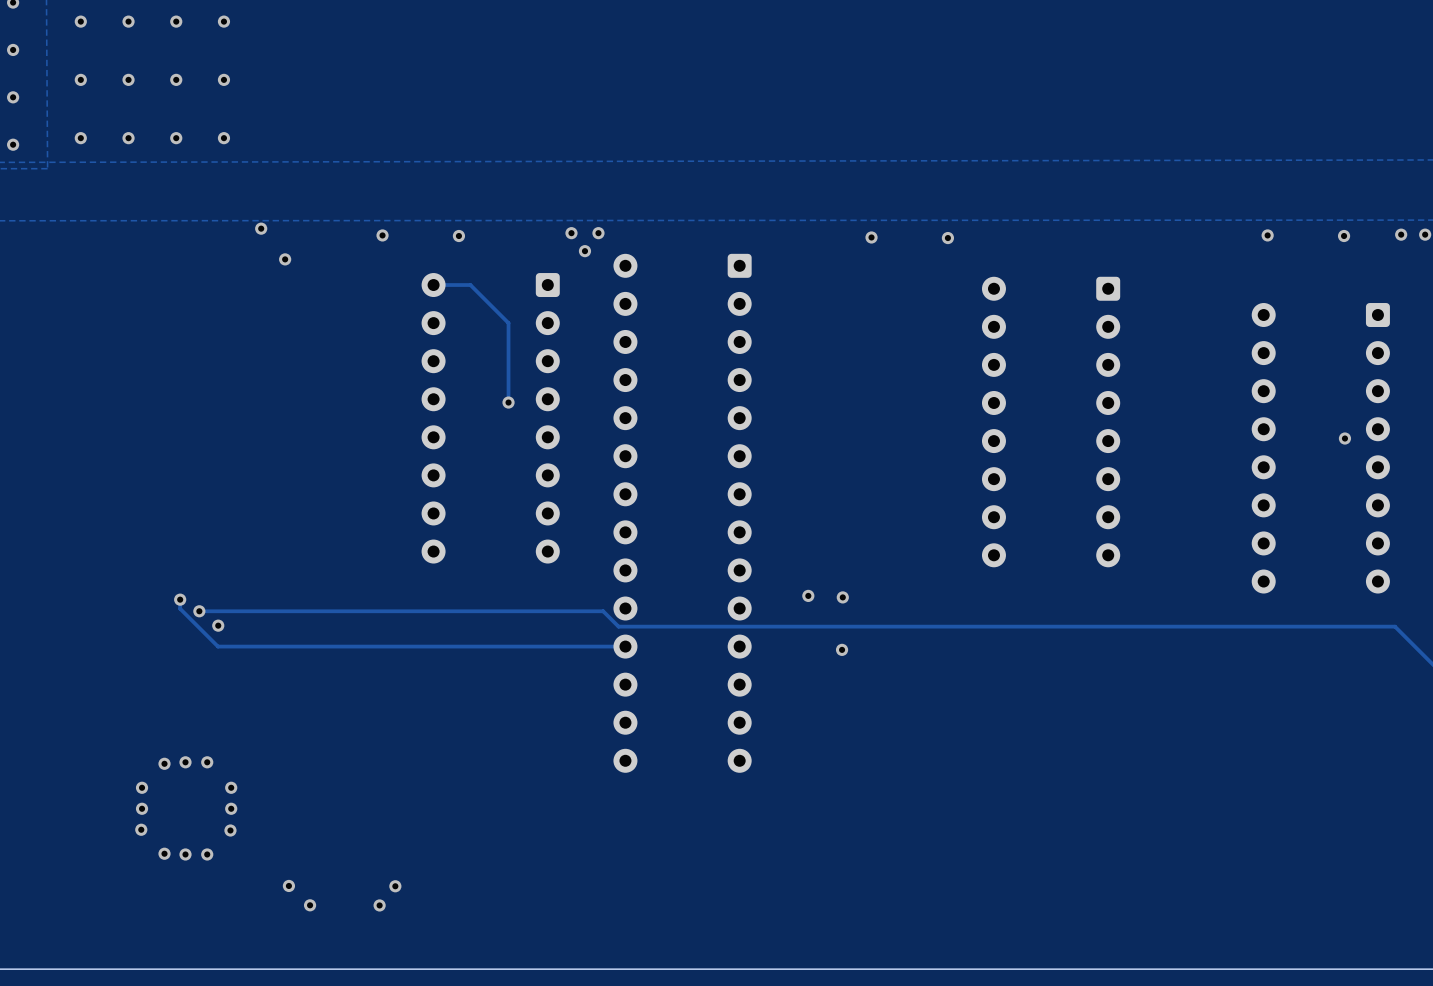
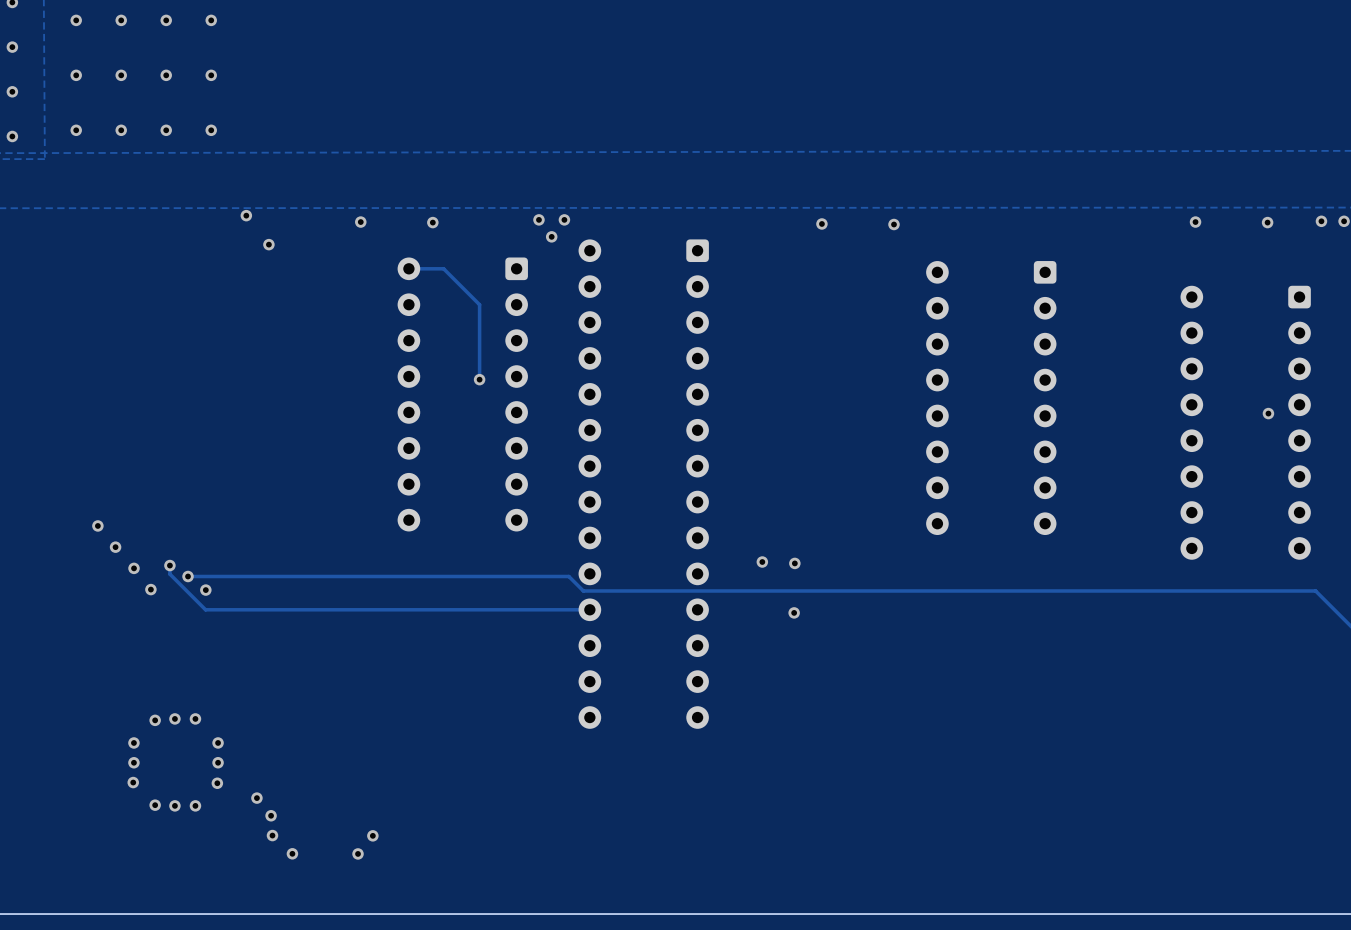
via: none -> (97, 525)
via: none -> (115, 547)
via: none -> (134, 568)
via: none -> (150, 589)
via: none -> (256, 798)
via: none -> (271, 815)

